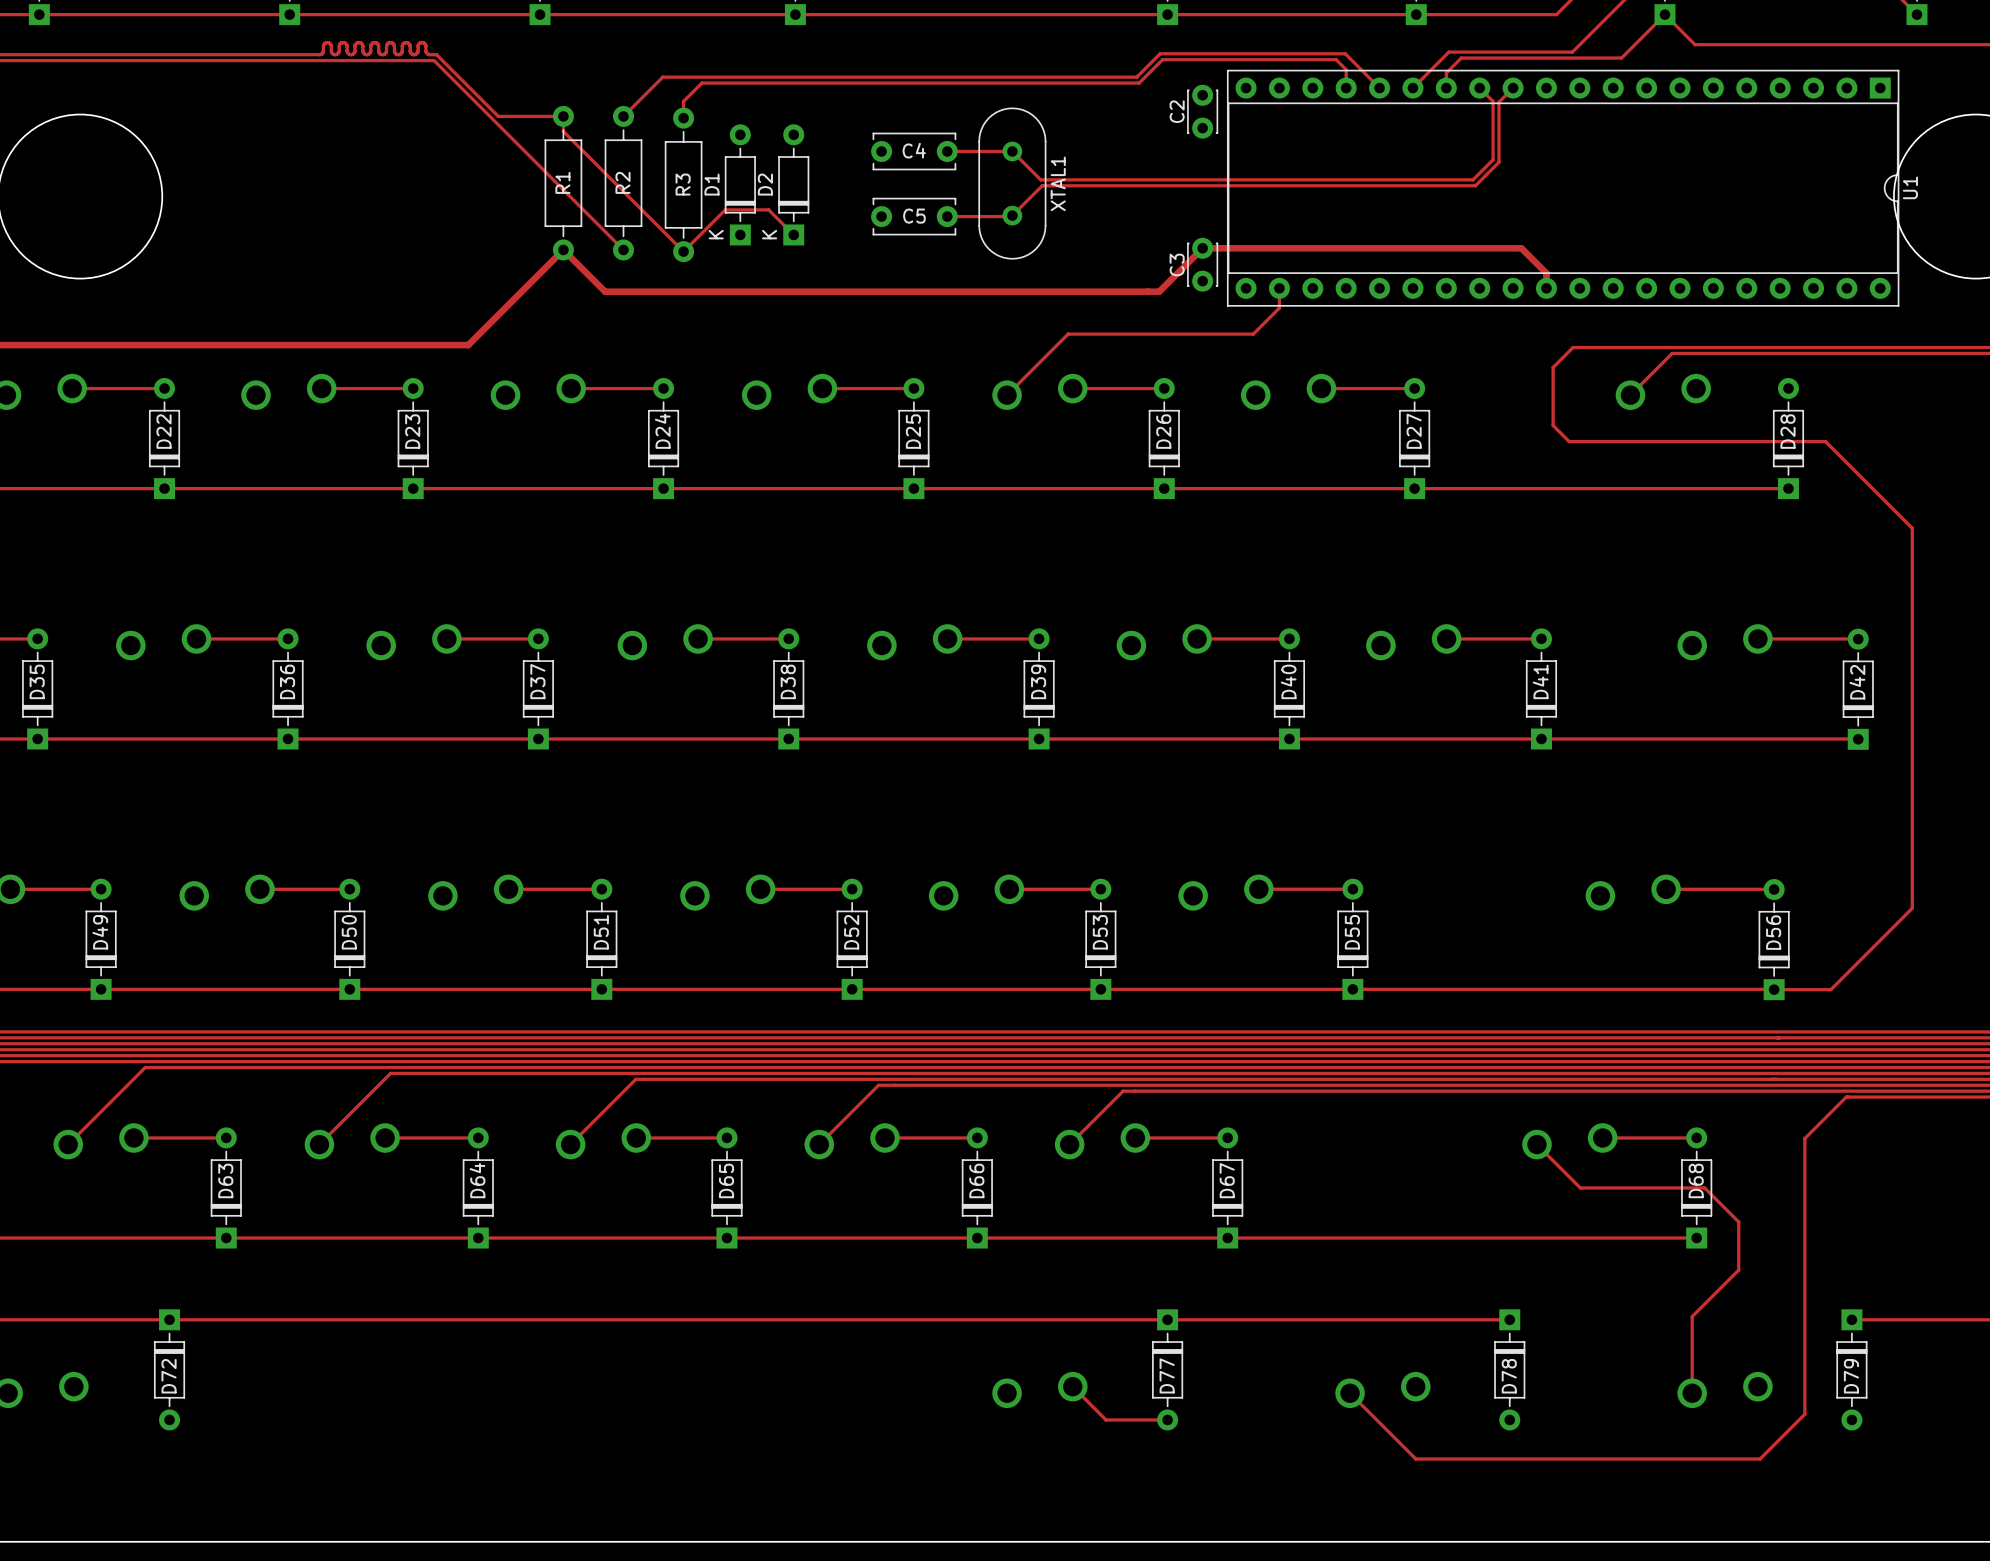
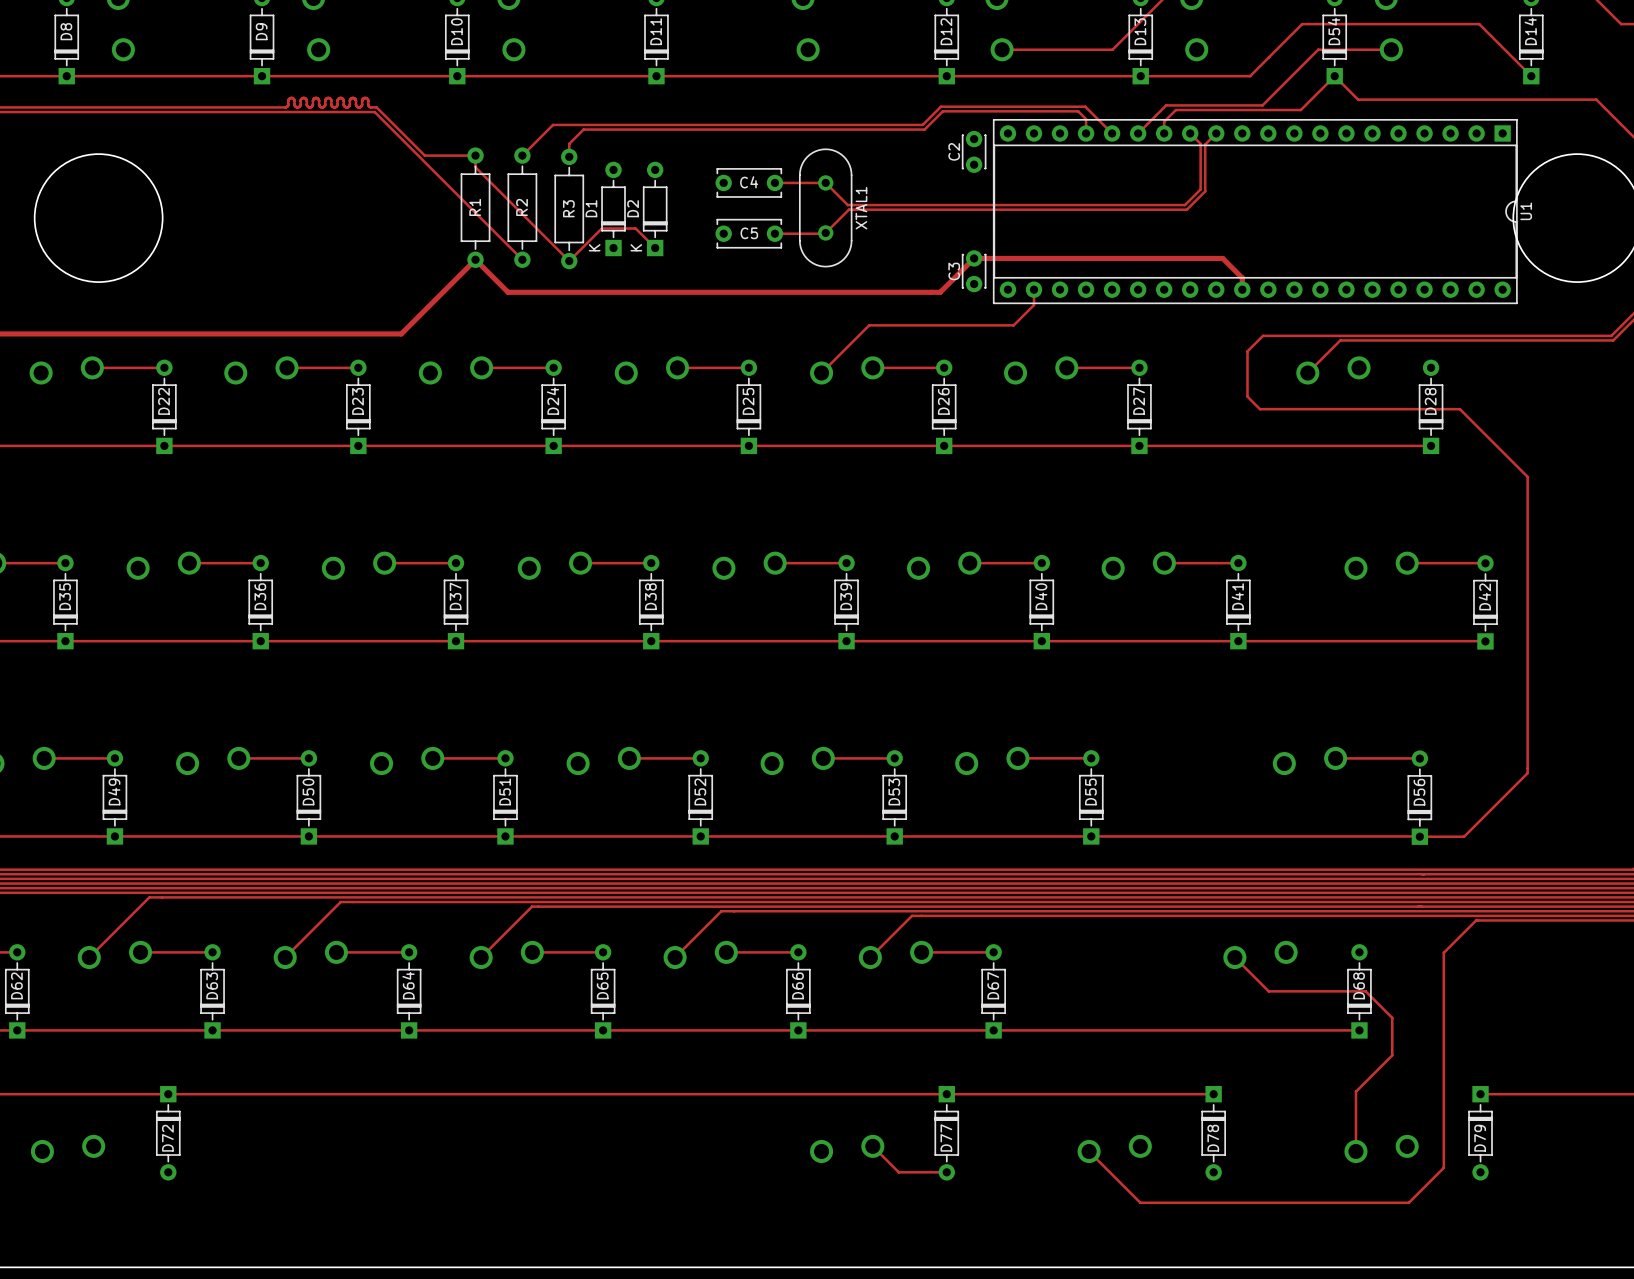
track: (1602, 1138) (1696, 1138) -> none

